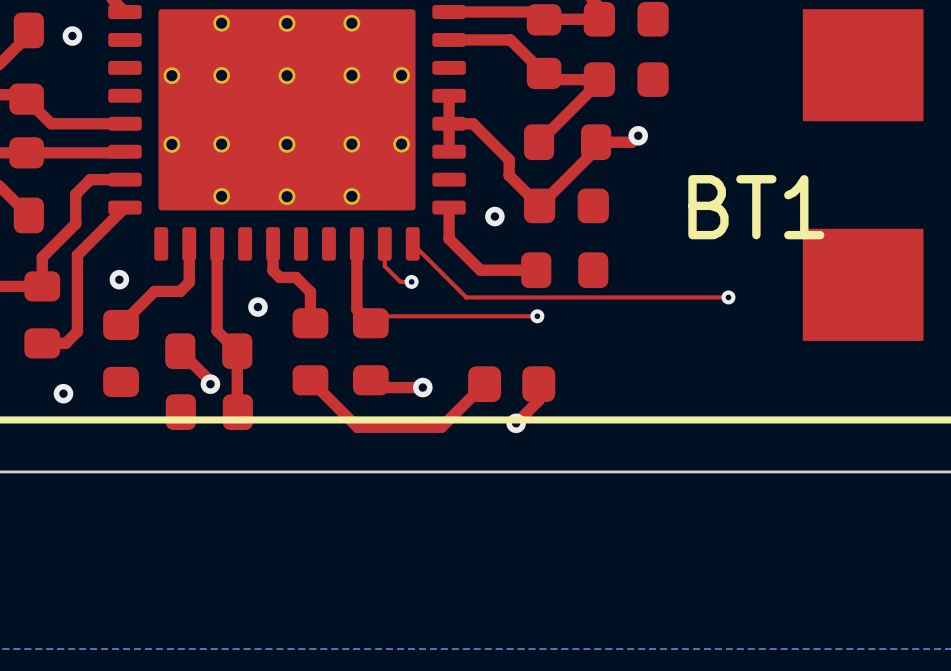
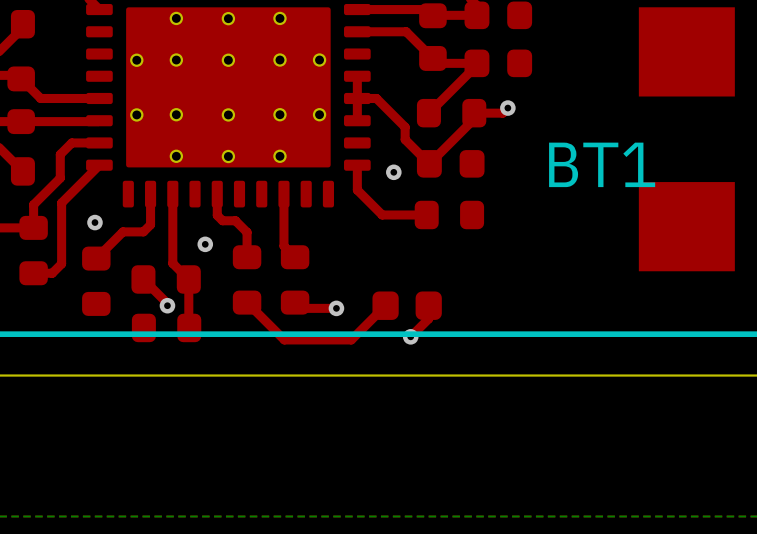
via: (72, 36) -> none
top track: (384, 238) (384, 266) (400, 281) (411, 281) -> none
top track: (412, 243) (466, 297) (728, 297) -> none
via: (411, 281) -> none
via: (728, 297) -> none
top track: (537, 316) (363, 316) -> none
via: (537, 316) -> none
via: (63, 393) -> none

